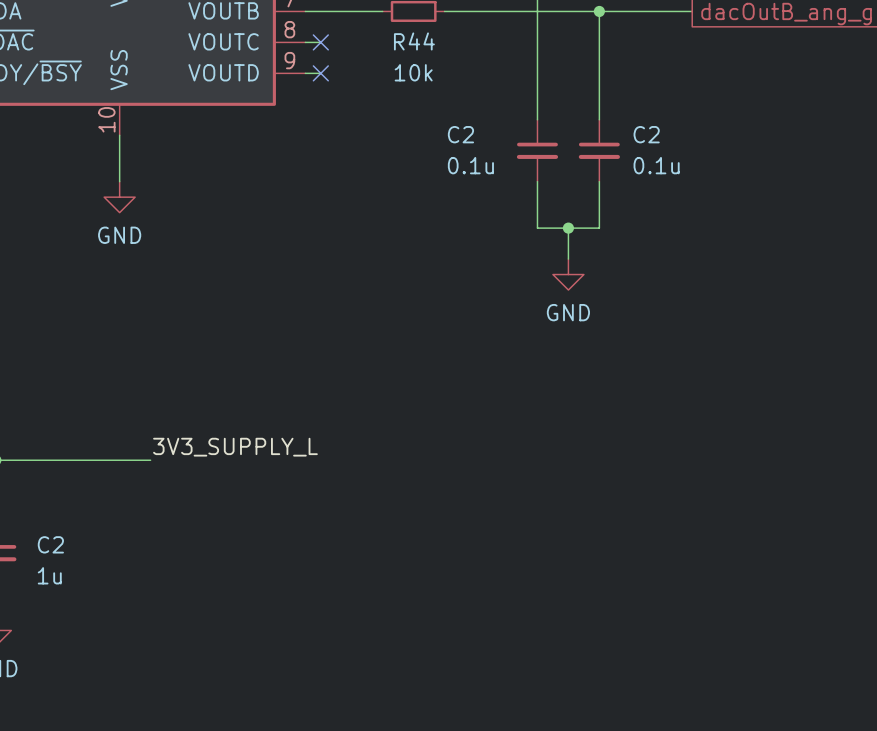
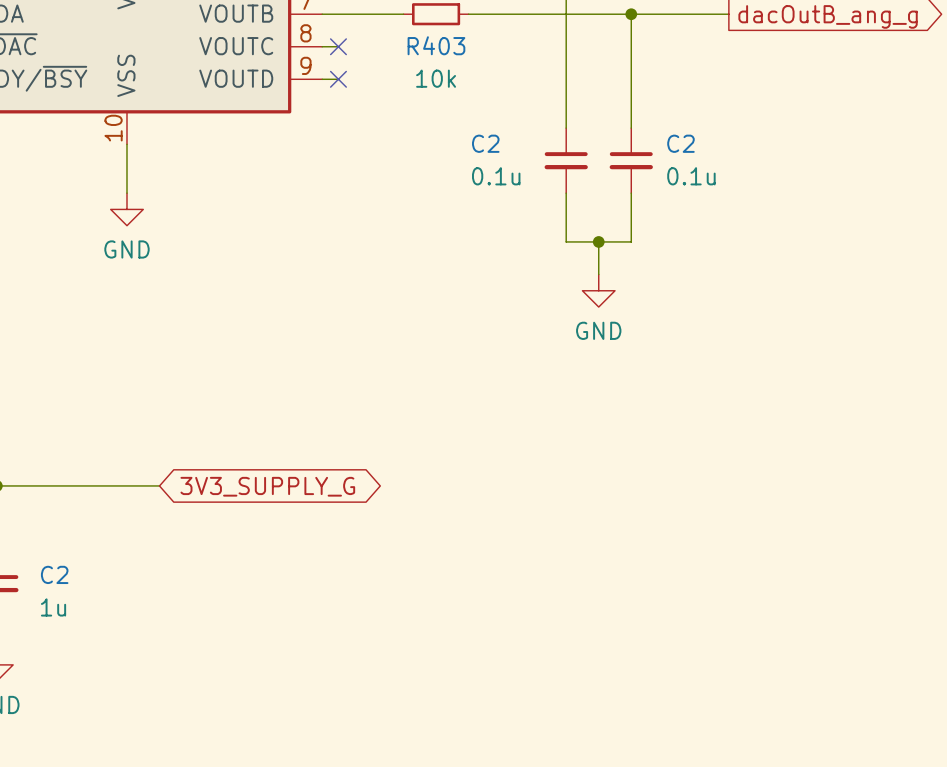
R44 name: R44 (414, 41) -> R403 (436, 45)
label: 3V3_SUPPLY_L (235, 447) -> none
global label: none -> 3V3_SUPPLY_G (267, 486)

